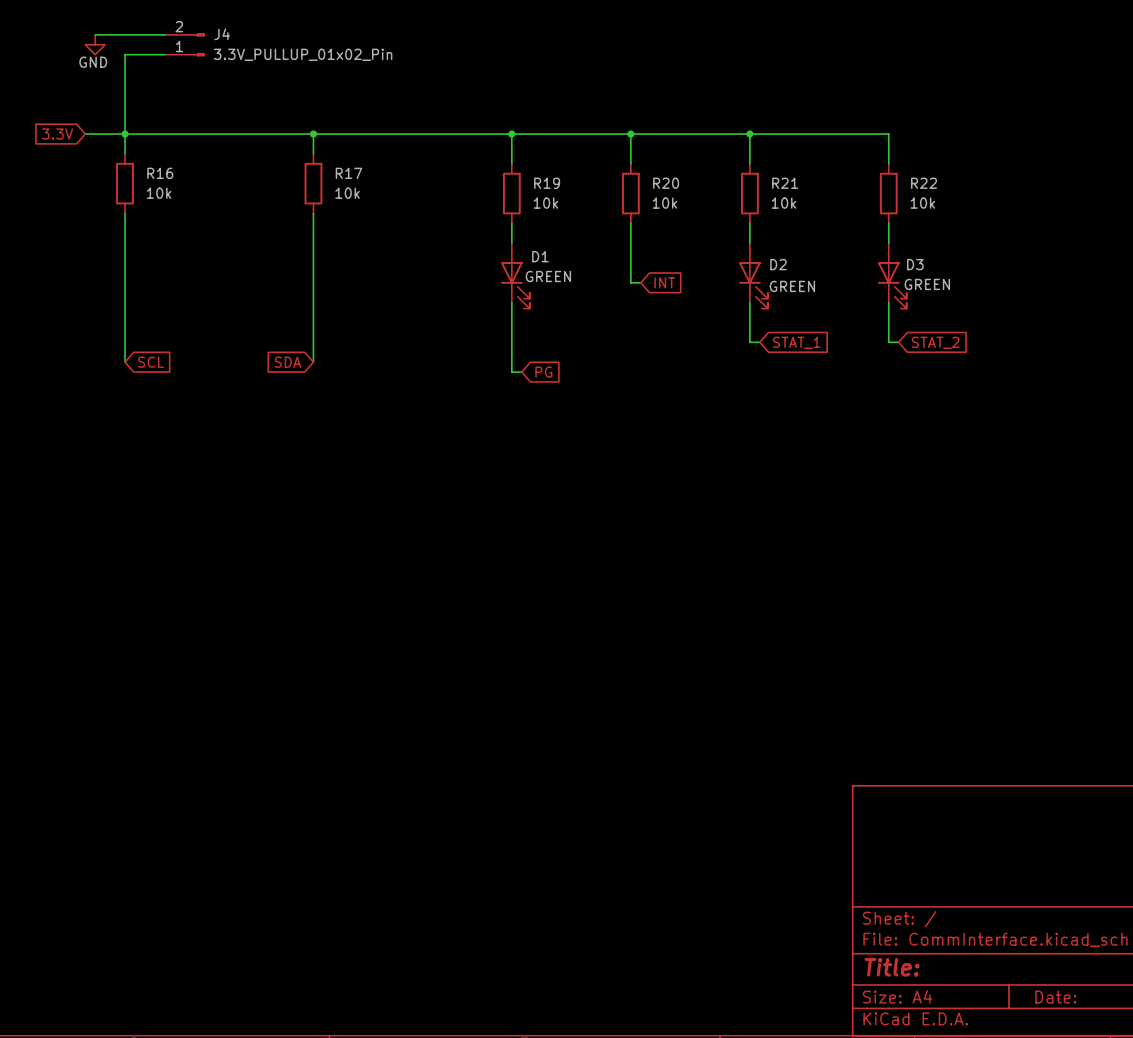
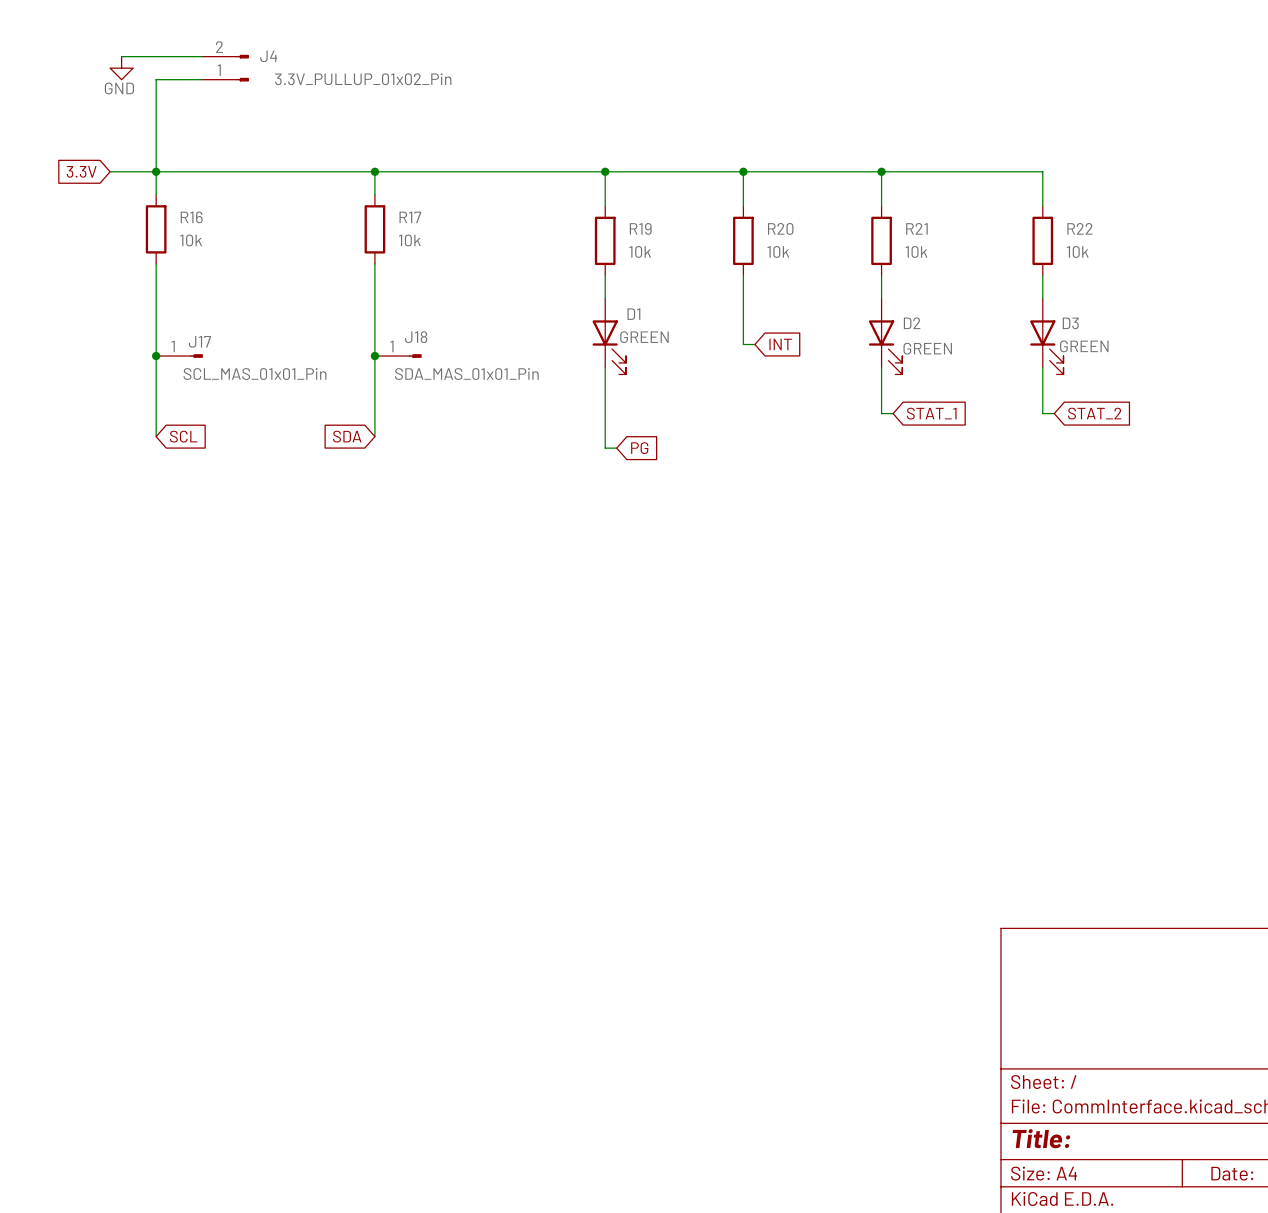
junction: none -> (156, 356)
J17: none -> SCL_MAS_01x01_Pin (179, 356)
junction: none -> (374, 356)
J18: none -> SDA_MAS_01x01_Pin (398, 356)

